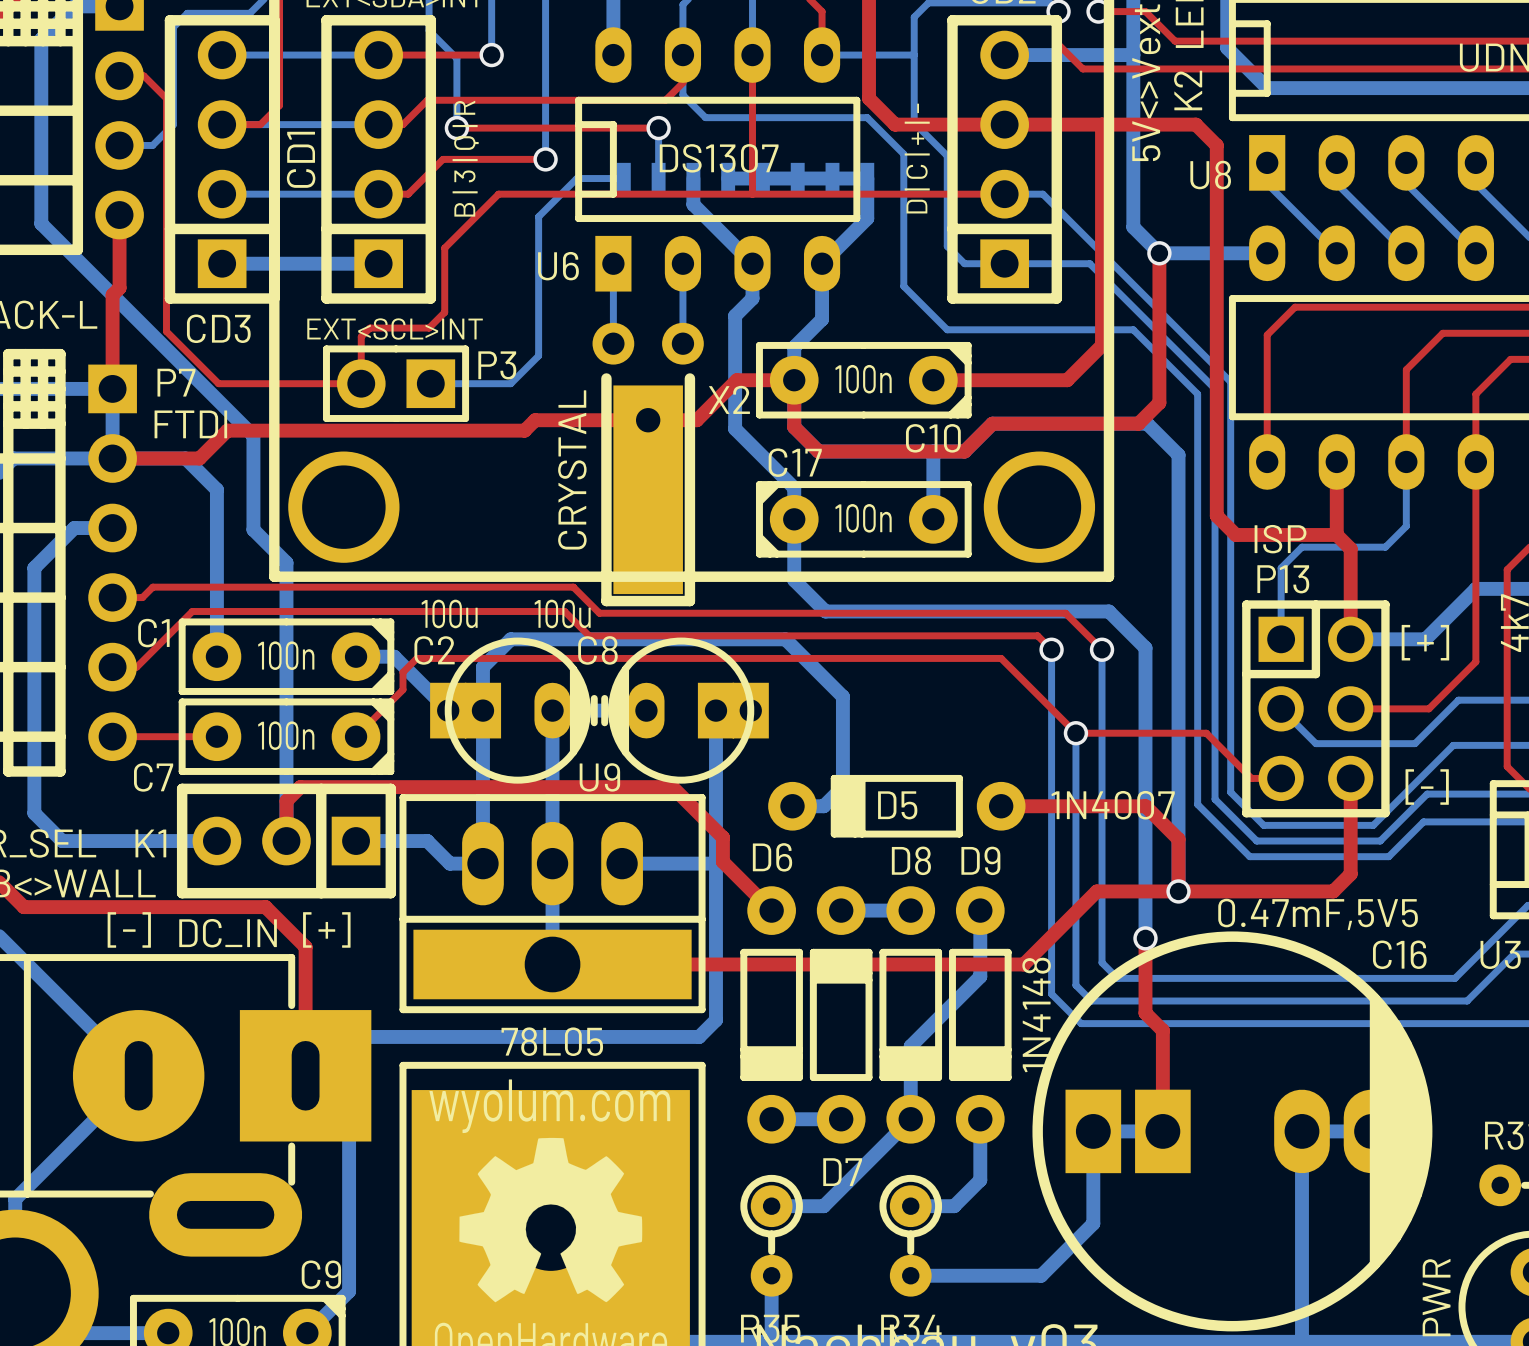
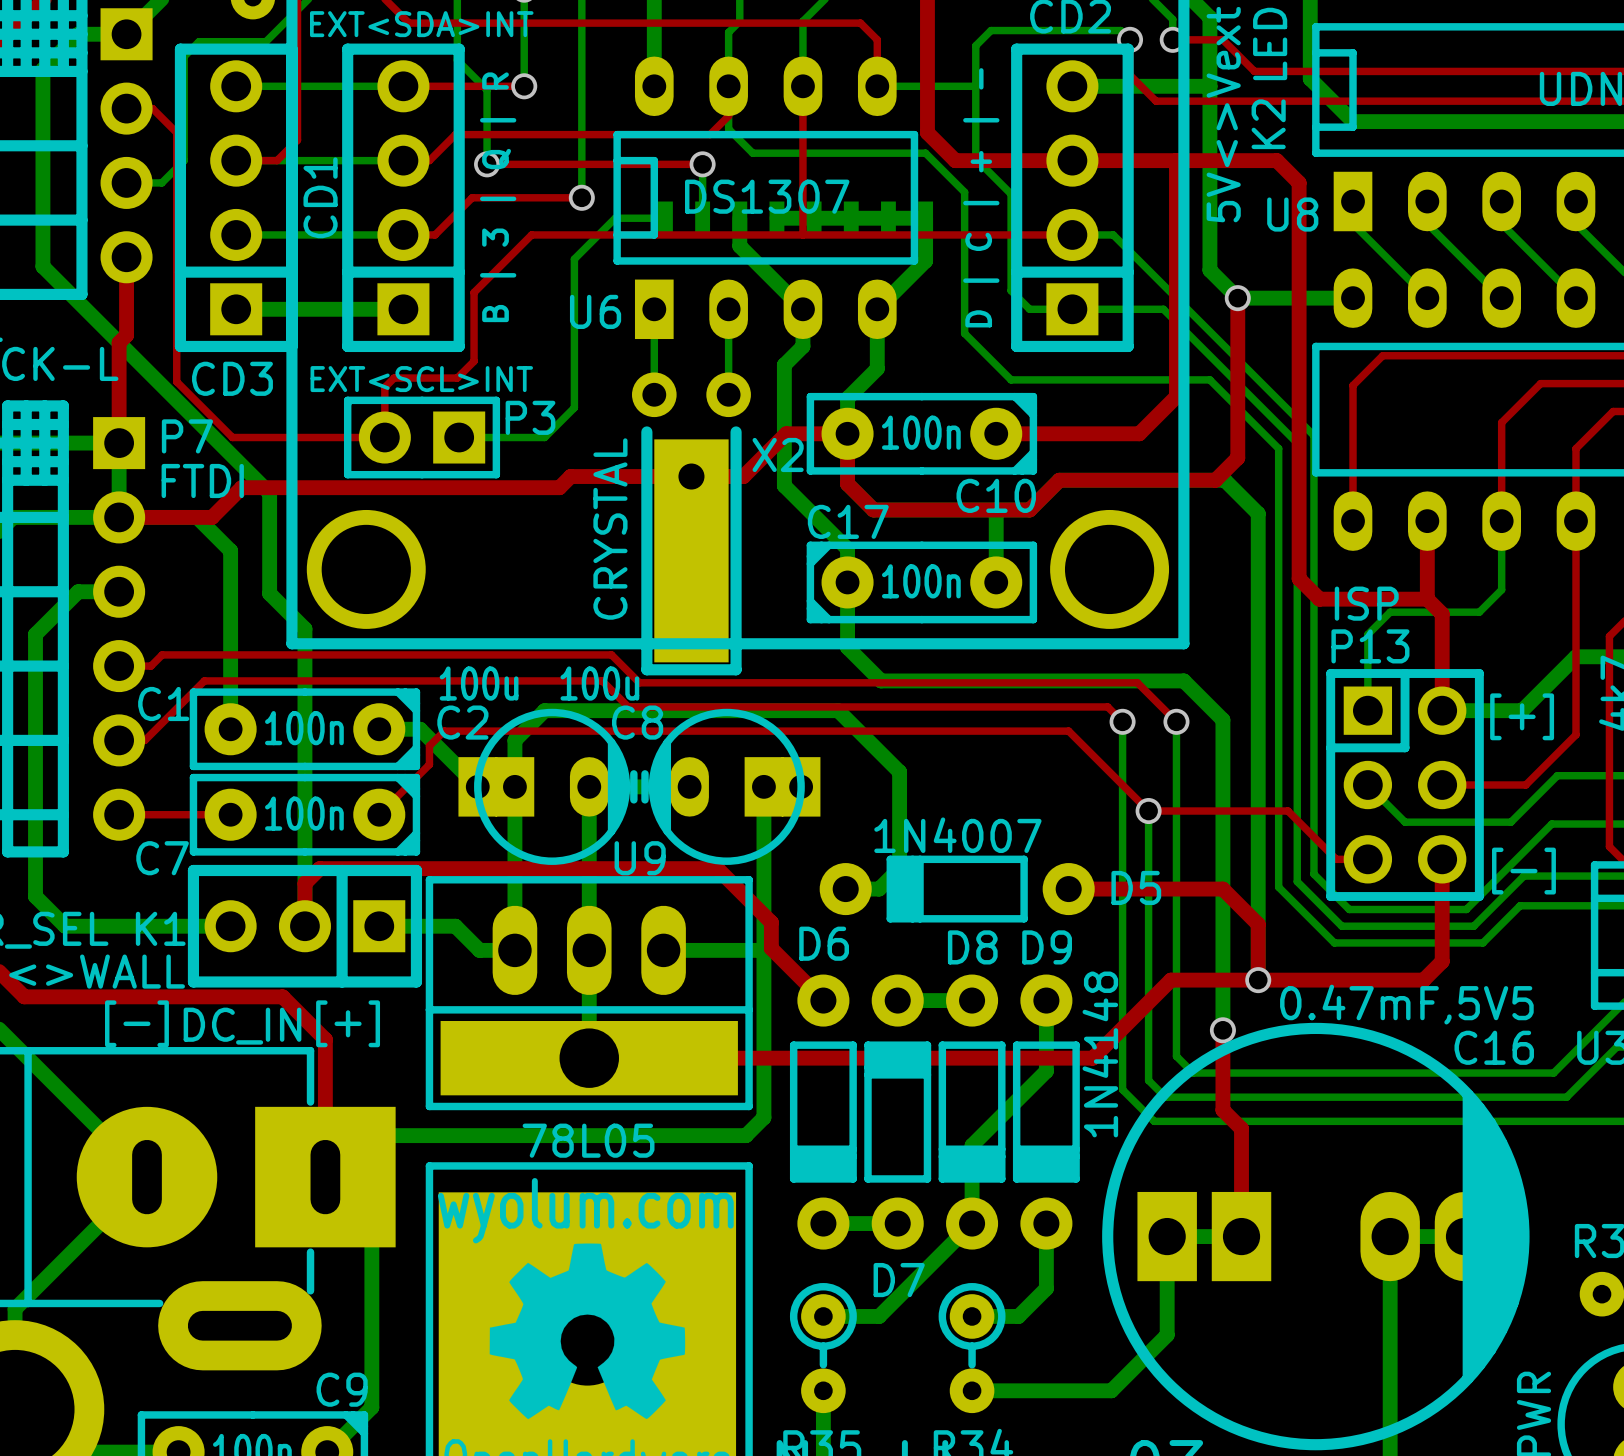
D5 name position: D5 (897, 805) -> D5 (1136, 887)
D5 value position: 1N4007 (1113, 805) -> 1N4007 (957, 835)
D9 value position: 1N4148 (1036, 1014) -> 1N4148 (1100, 1054)

